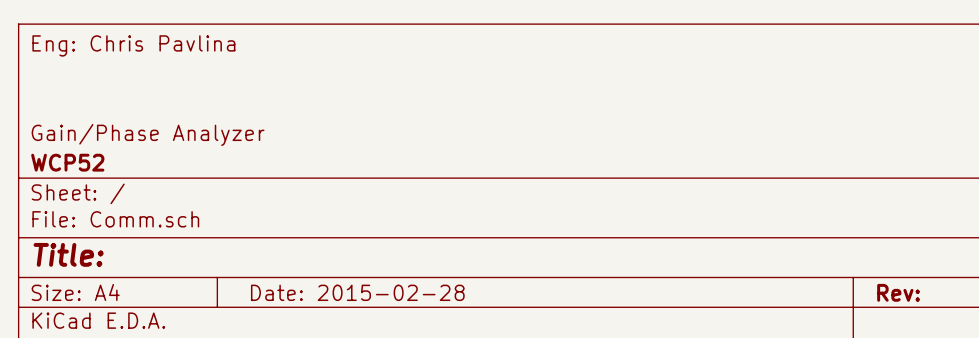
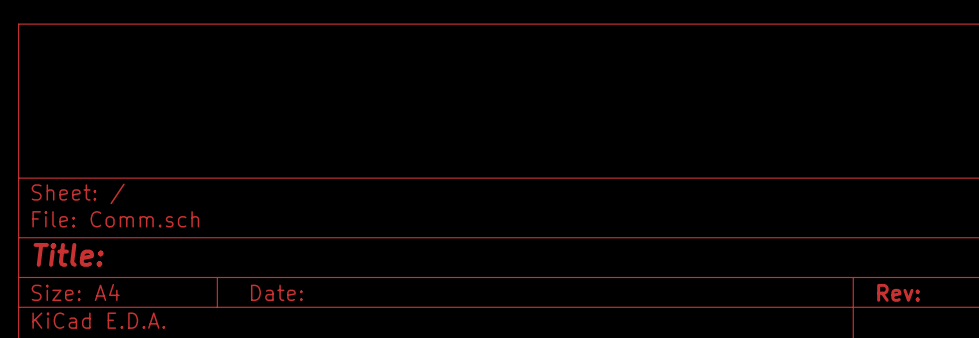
title block: Eng: Chris Pavlina (133, 45) -> none
title block: Gain/Phase Analyzer (148, 134) -> none
title block: WCP52 (67, 162) -> none
title block: Date: 2015-02-28 (357, 292) -> Date: (276, 292)

